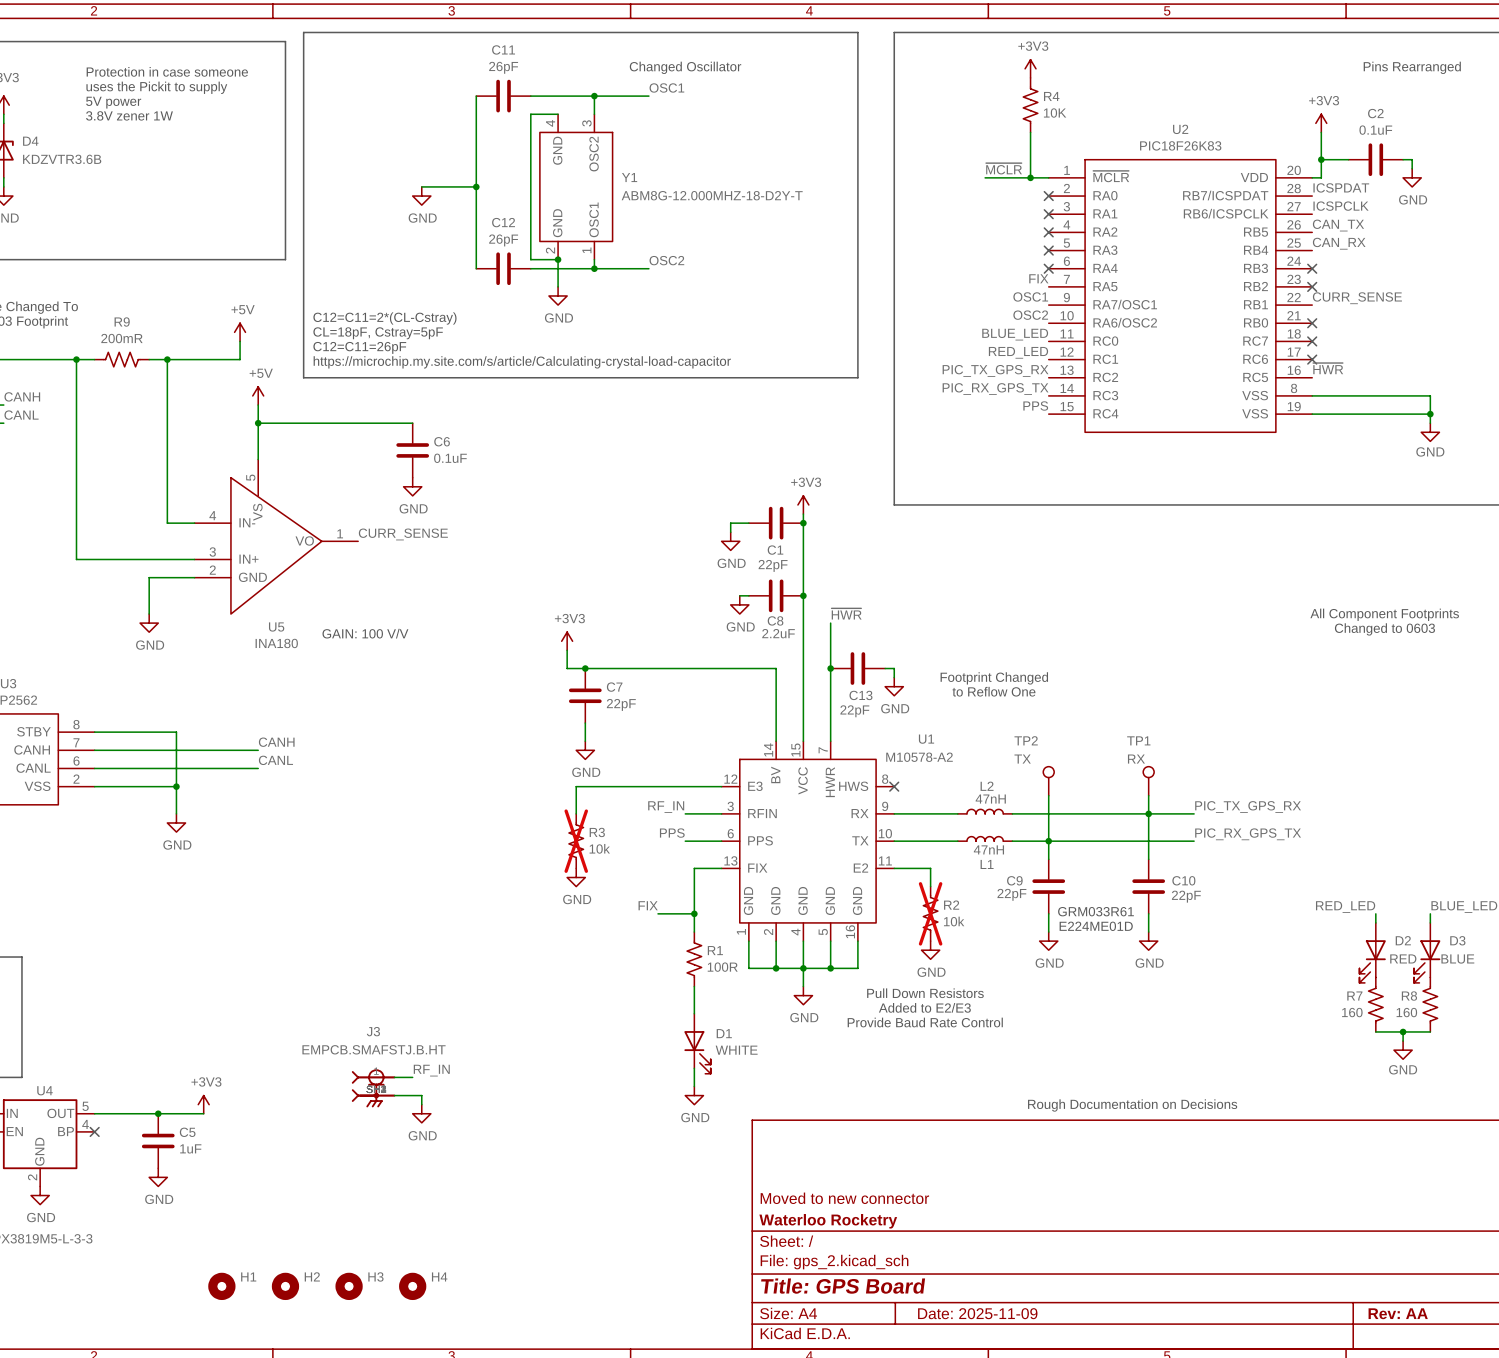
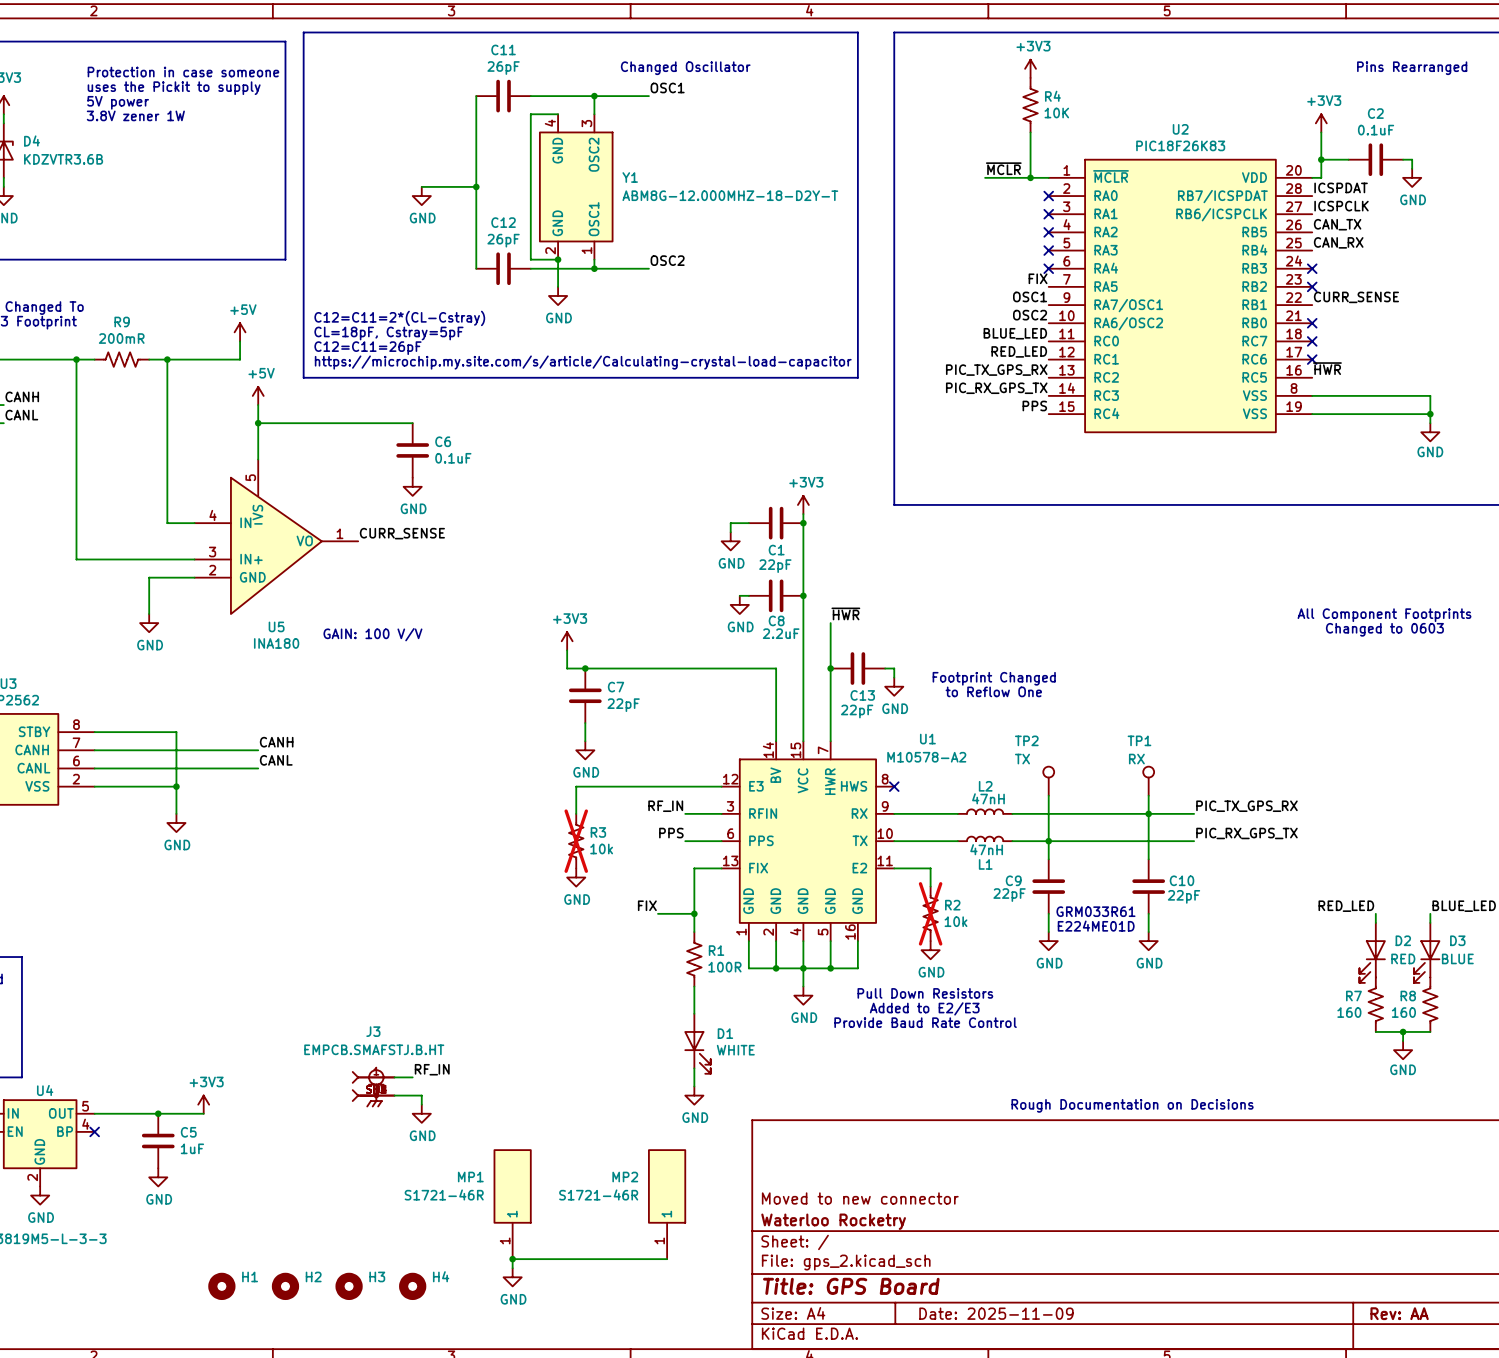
MP1: none -> S1721-46R (512, 1204)
MP2: none -> S1721-46R (667, 1204)
junction: none -> (512, 1259)
wire: none -> (667, 1259) (512, 1259) (512, 1268)
power symbol: none -> GND (512, 1277)

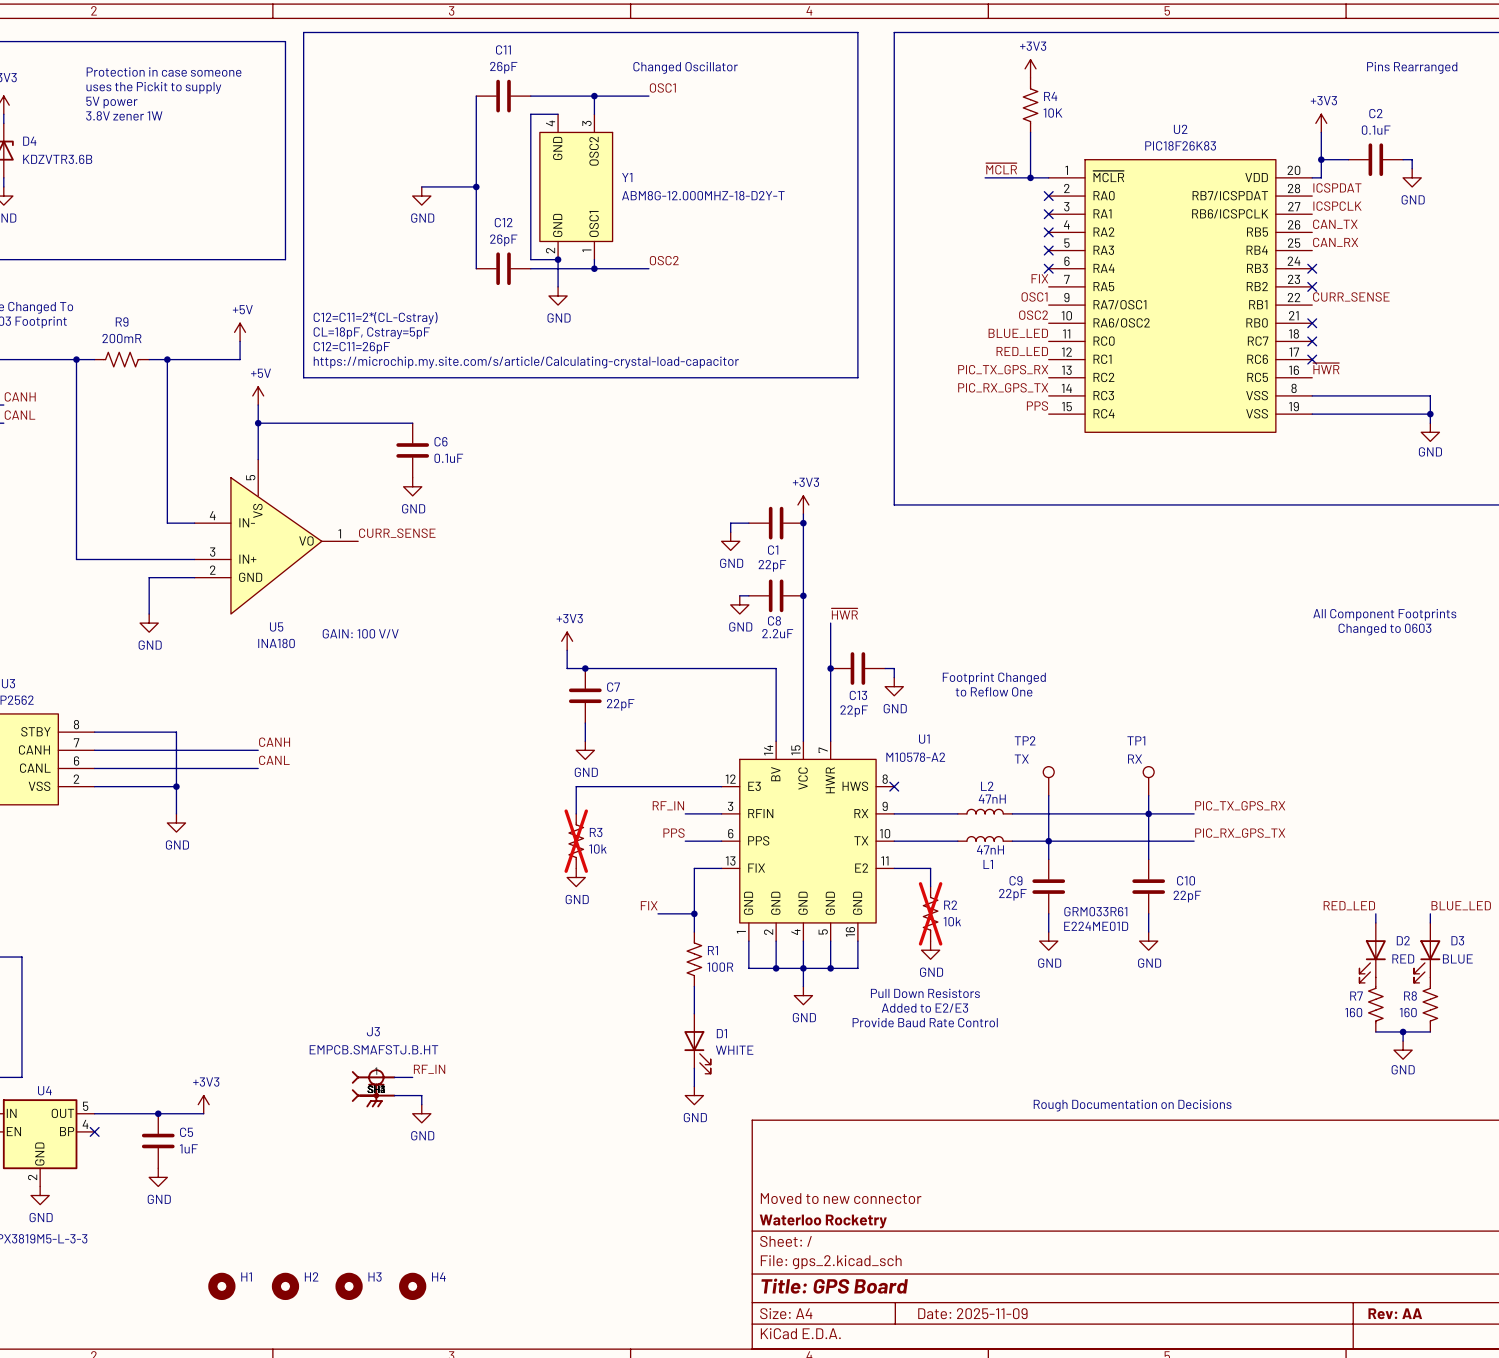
MP1: S1721-46R (512, 1204) -> none
MP2: S1721-46R (667, 1204) -> none
junction: (512, 1259) -> none
wire: (667, 1259) (512, 1259) (512, 1268) -> none
power symbol: GND (512, 1277) -> none

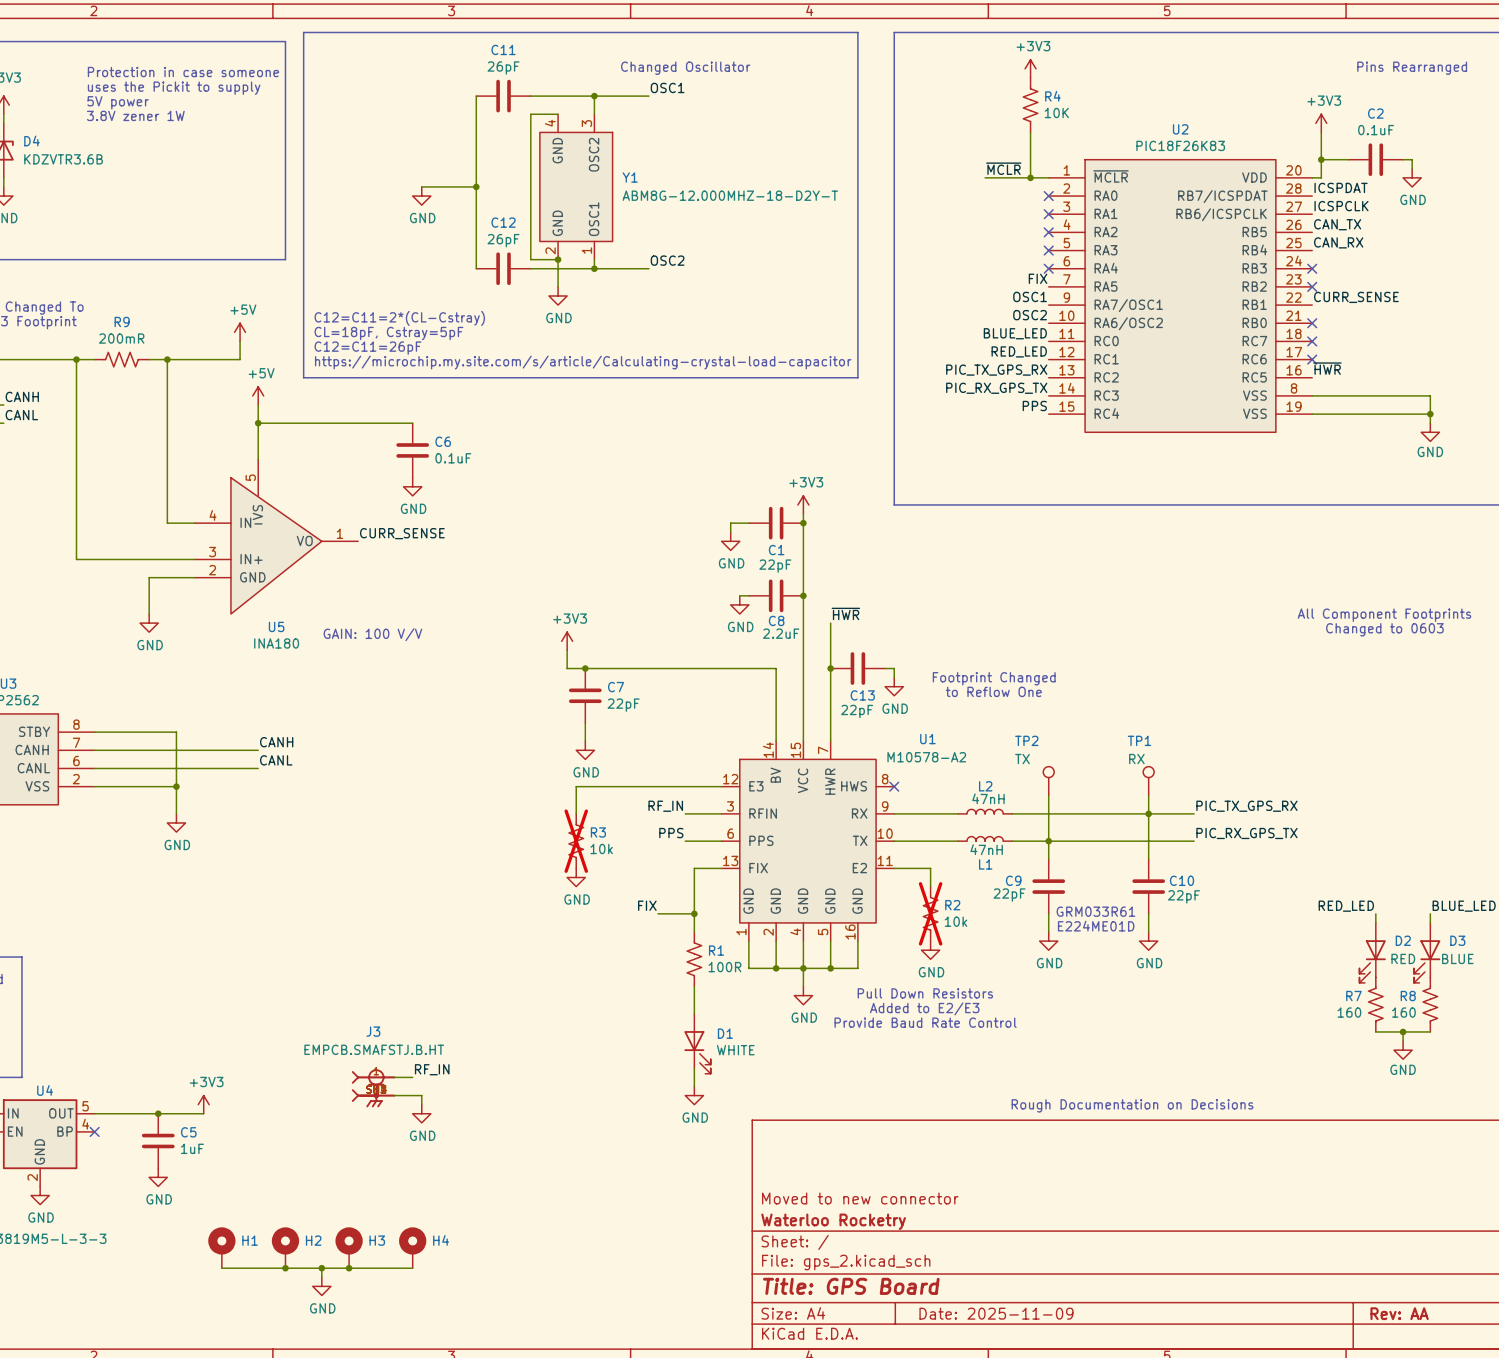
wire: none -> (221, 1268) (412, 1268)
junction: none -> (285, 1268)
wire: none -> (321, 1268) (321, 1277)
junction: none -> (321, 1268)
junction: none -> (349, 1268)
H1 symbol: [208, 1272, 236, 1301] -> [208, 1227, 236, 1269]
H2 symbol: [271, 1272, 300, 1301] -> [271, 1227, 300, 1269]
H3 symbol: [335, 1272, 363, 1301] -> [335, 1227, 363, 1269]
H4 symbol: [399, 1272, 427, 1301] -> [399, 1227, 427, 1269]
power symbol: none -> GND (321, 1286)

